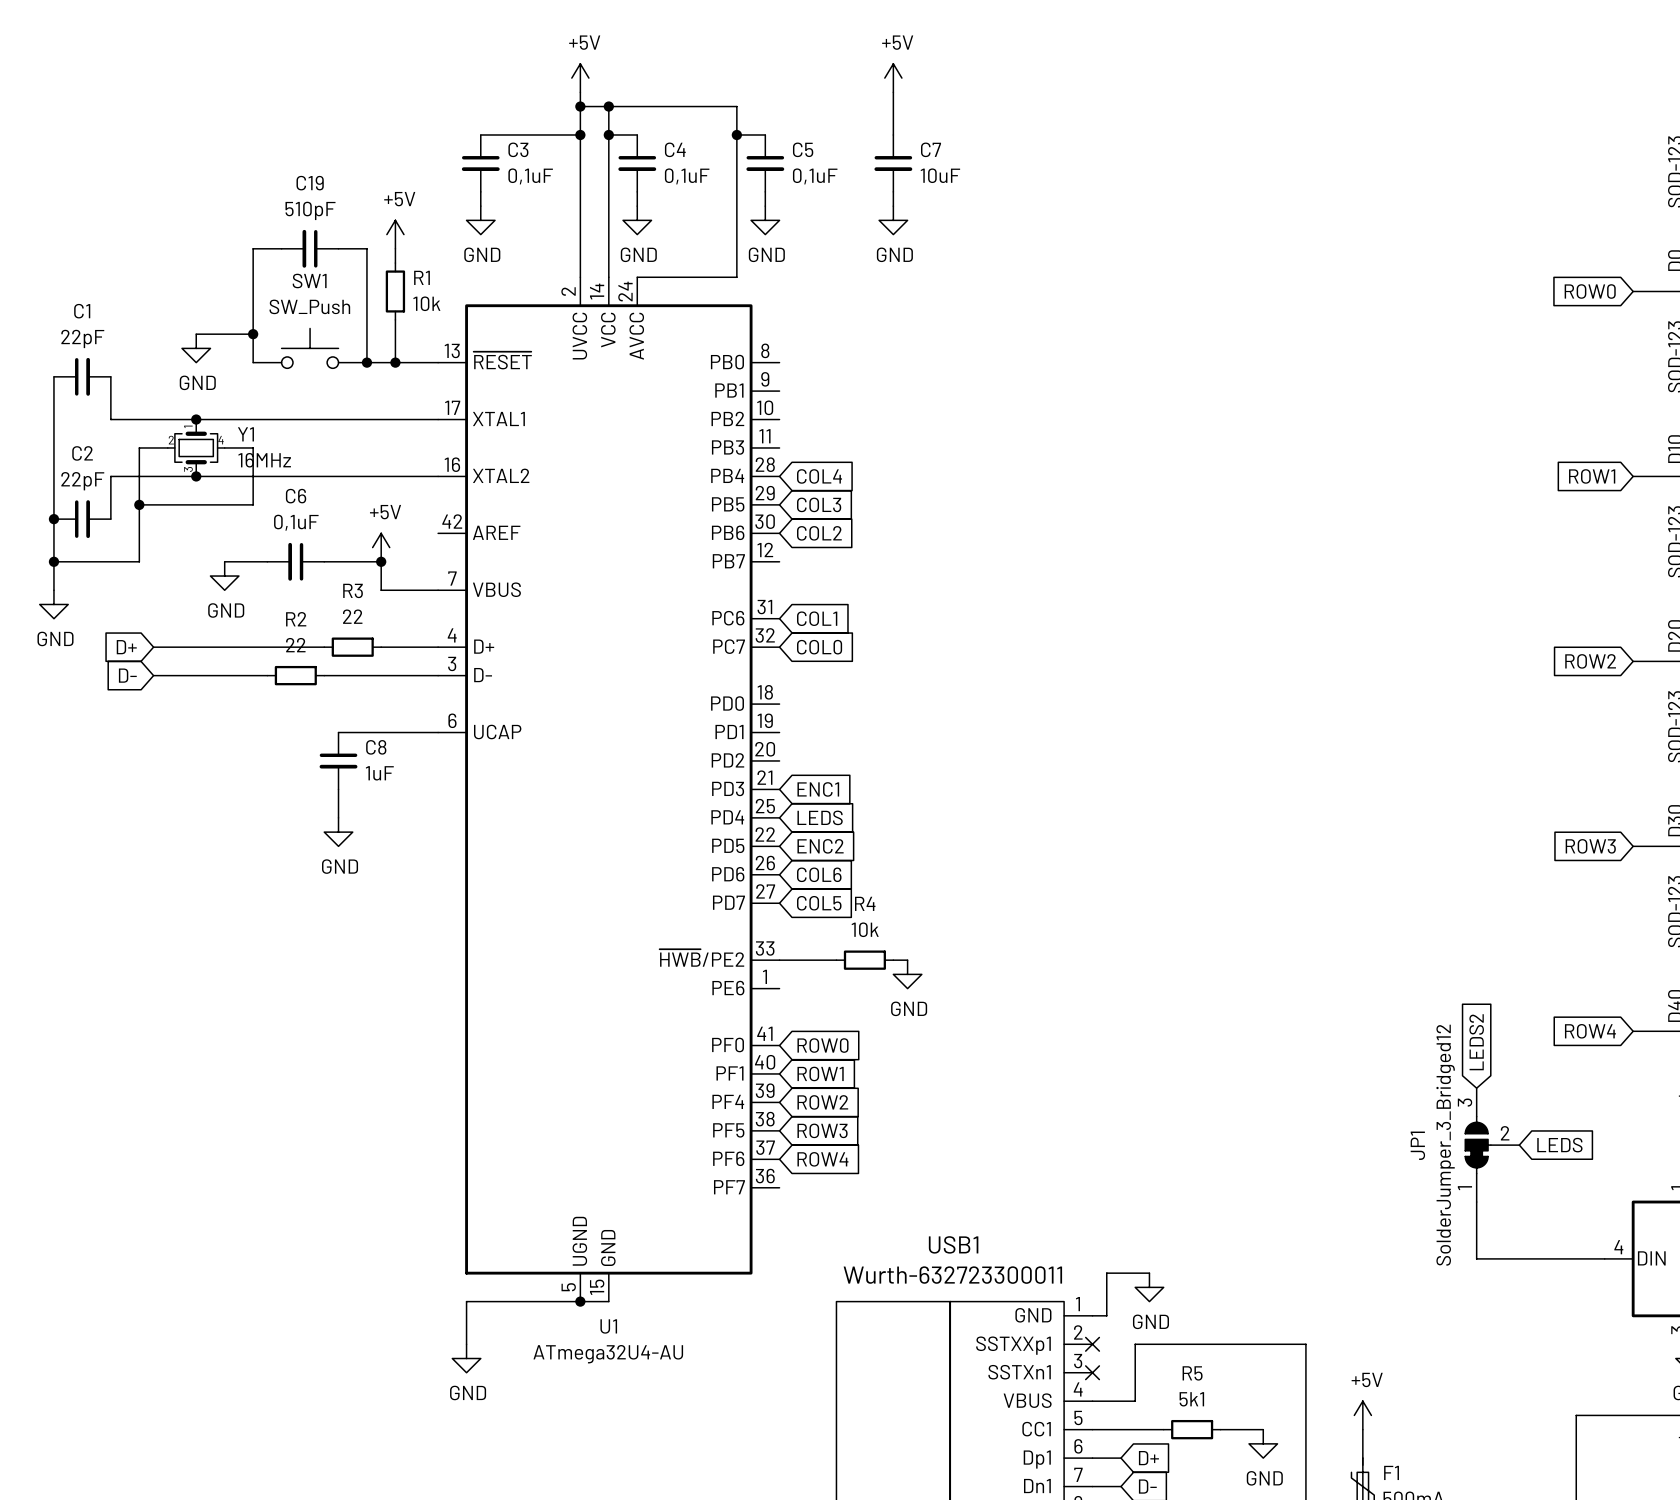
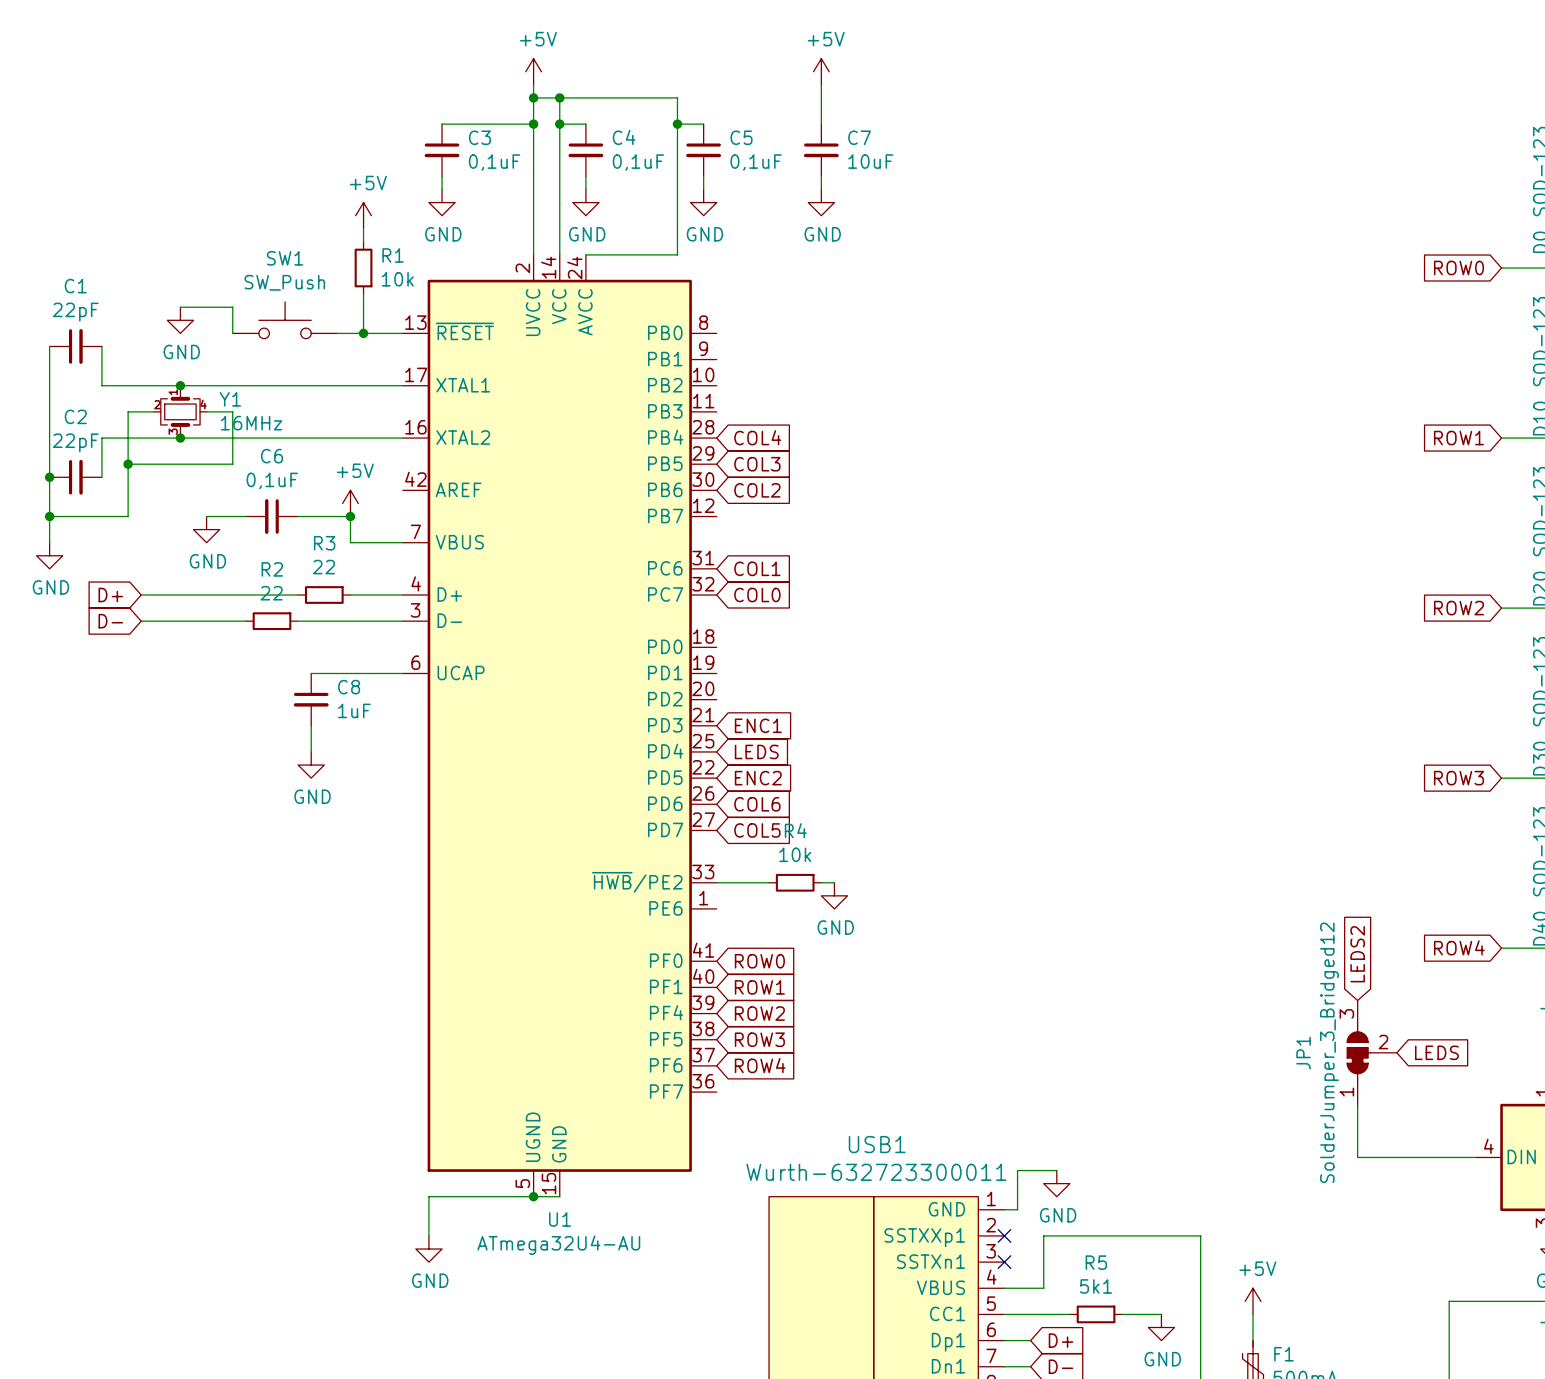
wire: (281, 248) (253, 248) (253, 334) -> none
C19: 510pF (310, 248) -> none
wire: (338, 248) (366, 248) (366, 362) -> none
junction: (253, 334) -> none
junction: (366, 362) -> none

